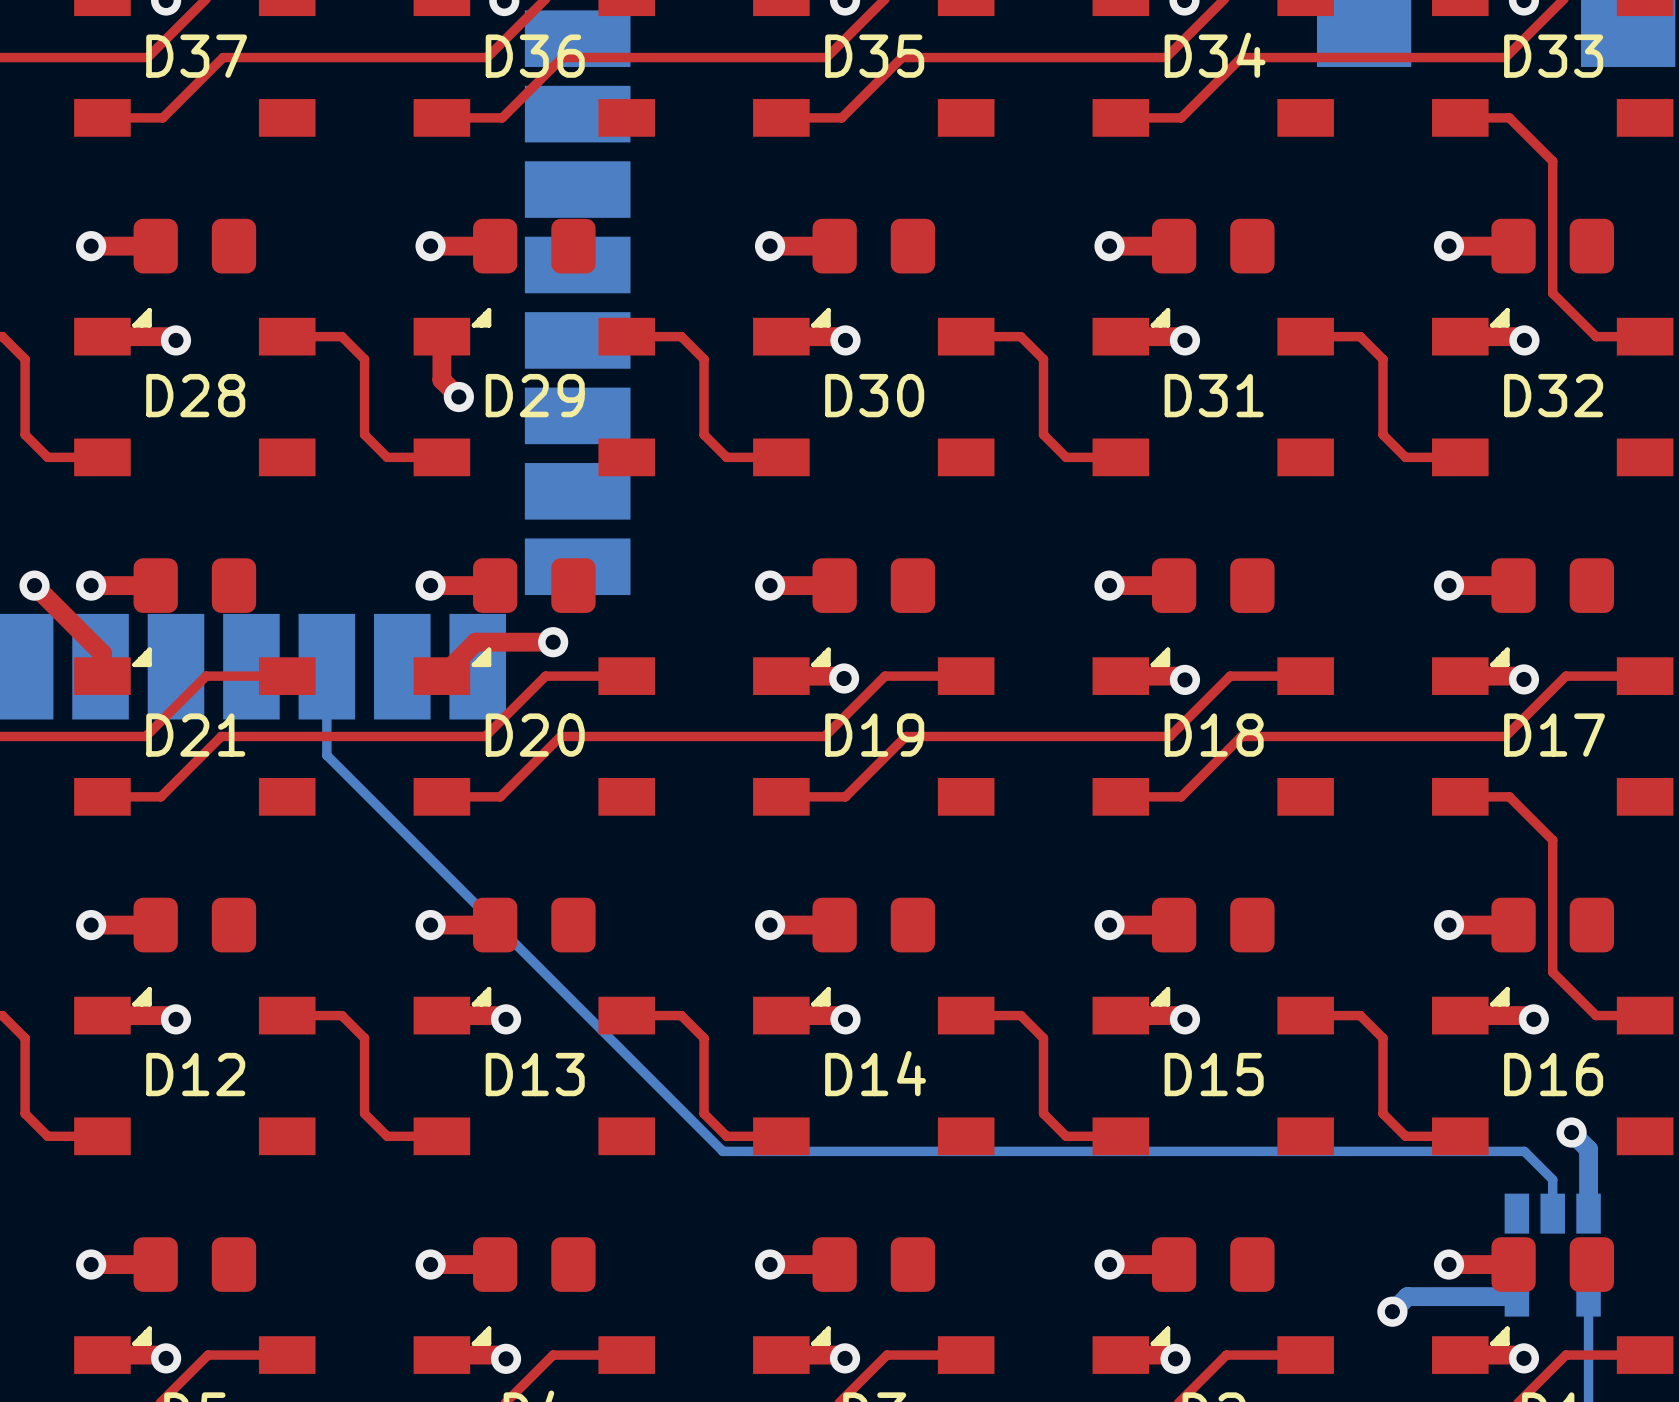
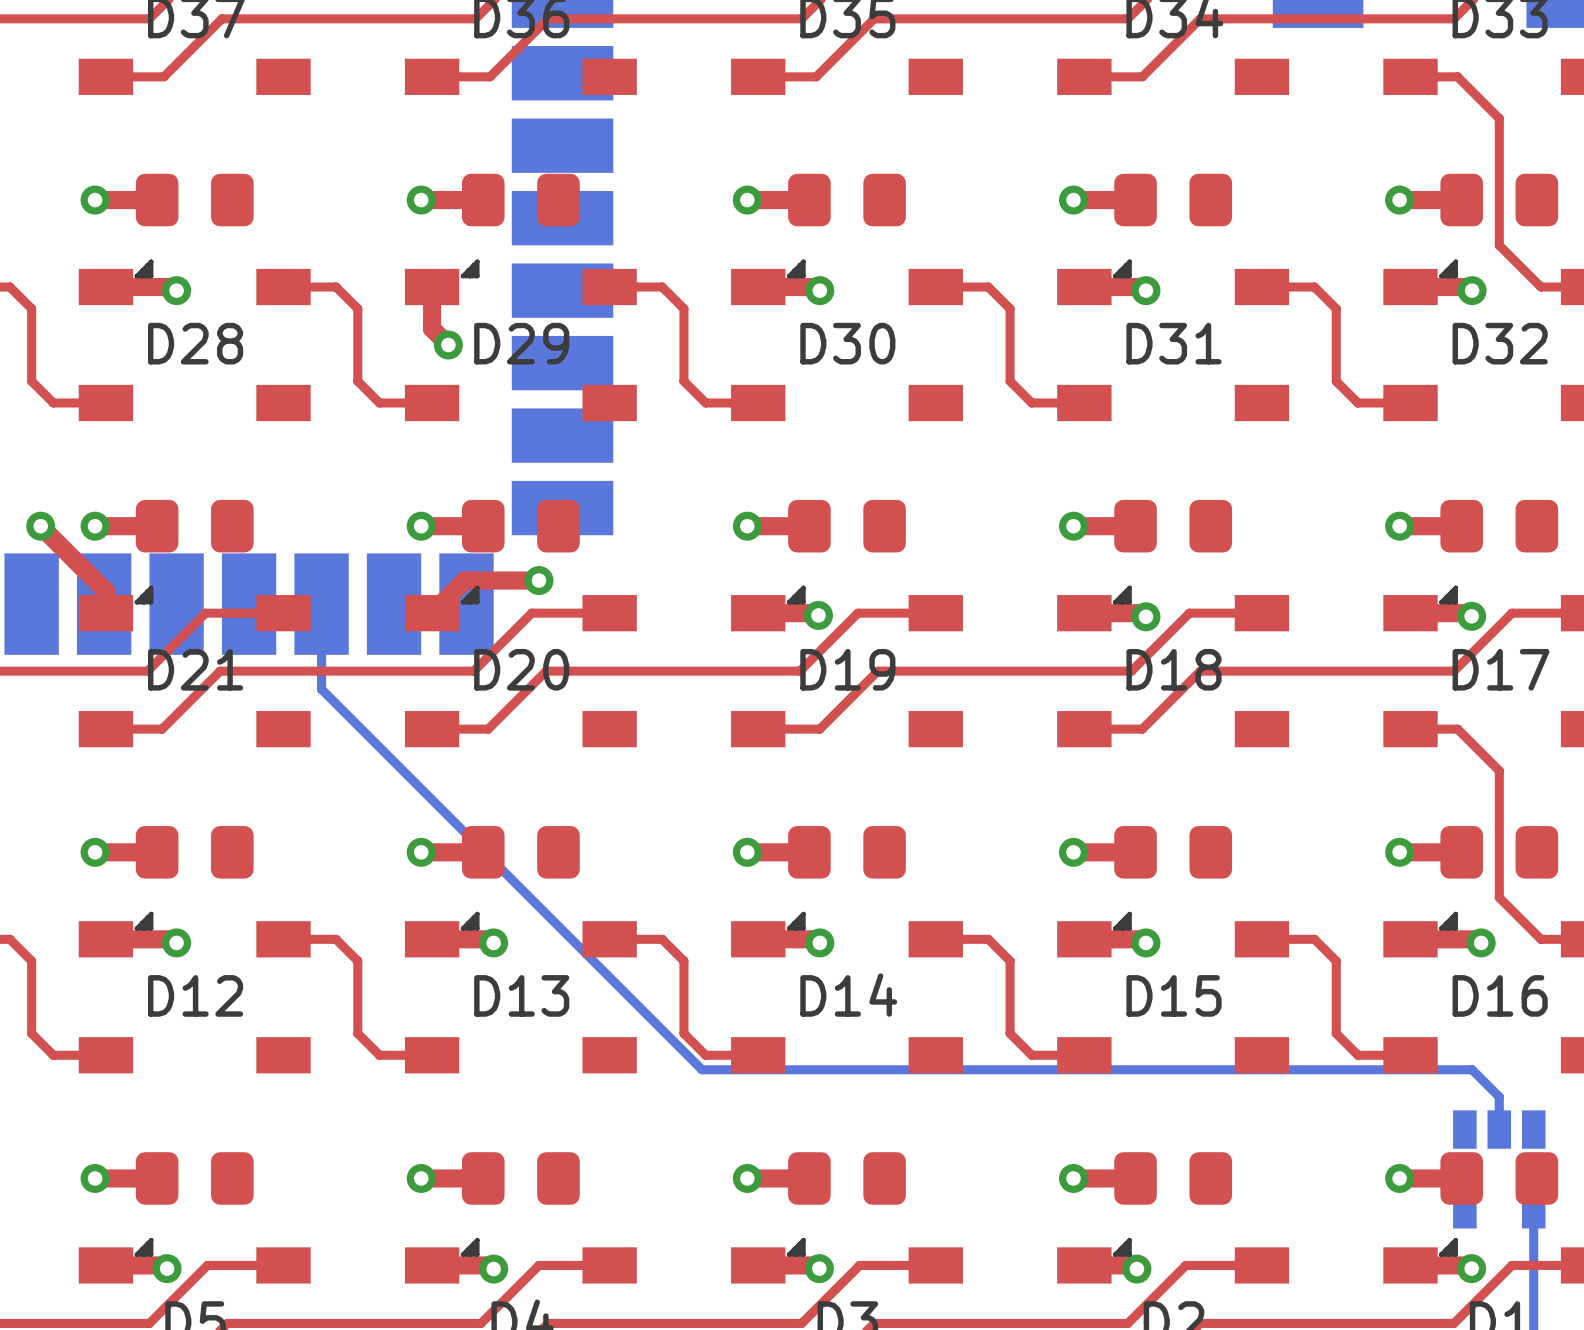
bottom track: (1571, 1132) (1588, 1149) (1588, 1213) -> none
via: (1571, 1132) -> none
bottom track: (1516, 1296) (1407, 1296) (1392, 1311) -> none
via: (1392, 1311) -> none

